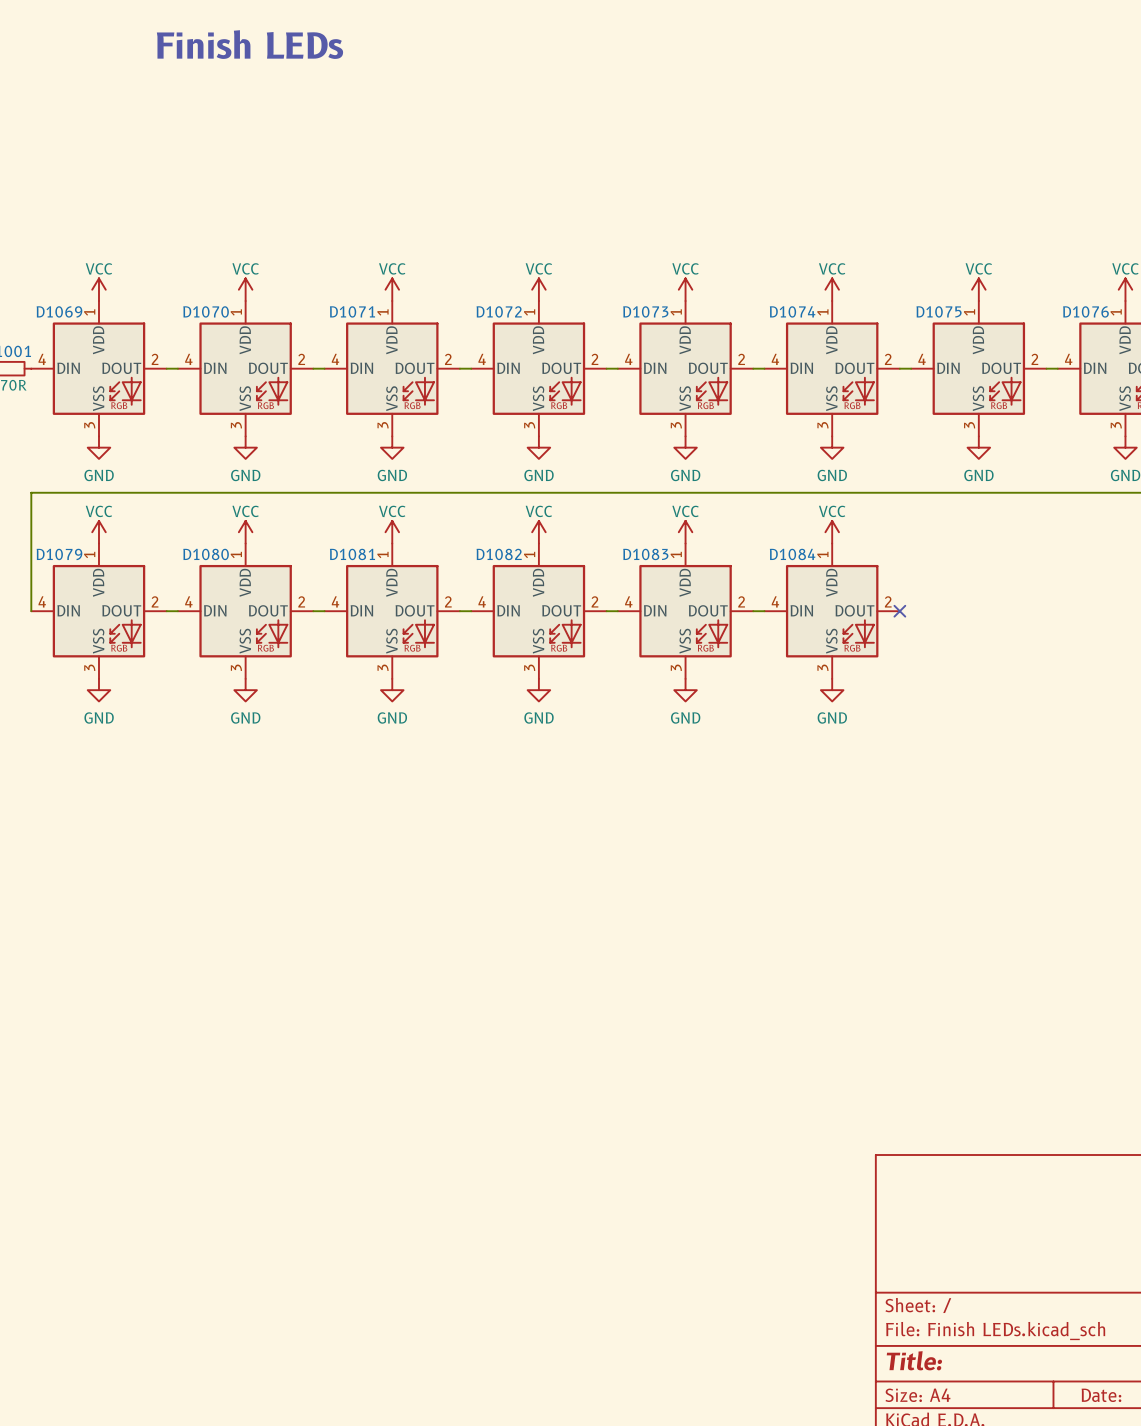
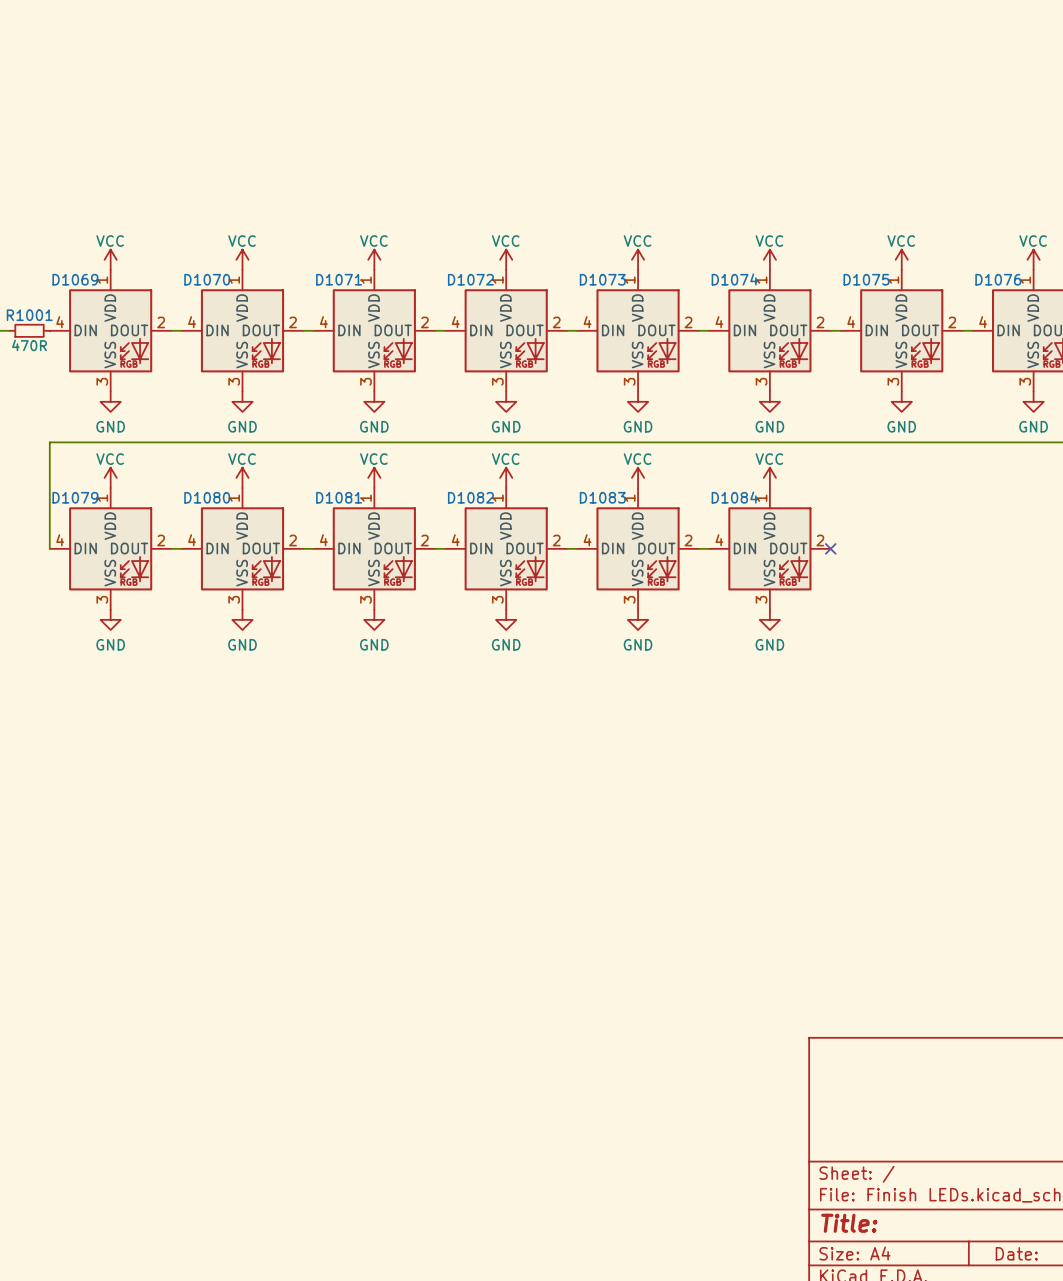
text: Finish LEDs (249, 44) -> none

